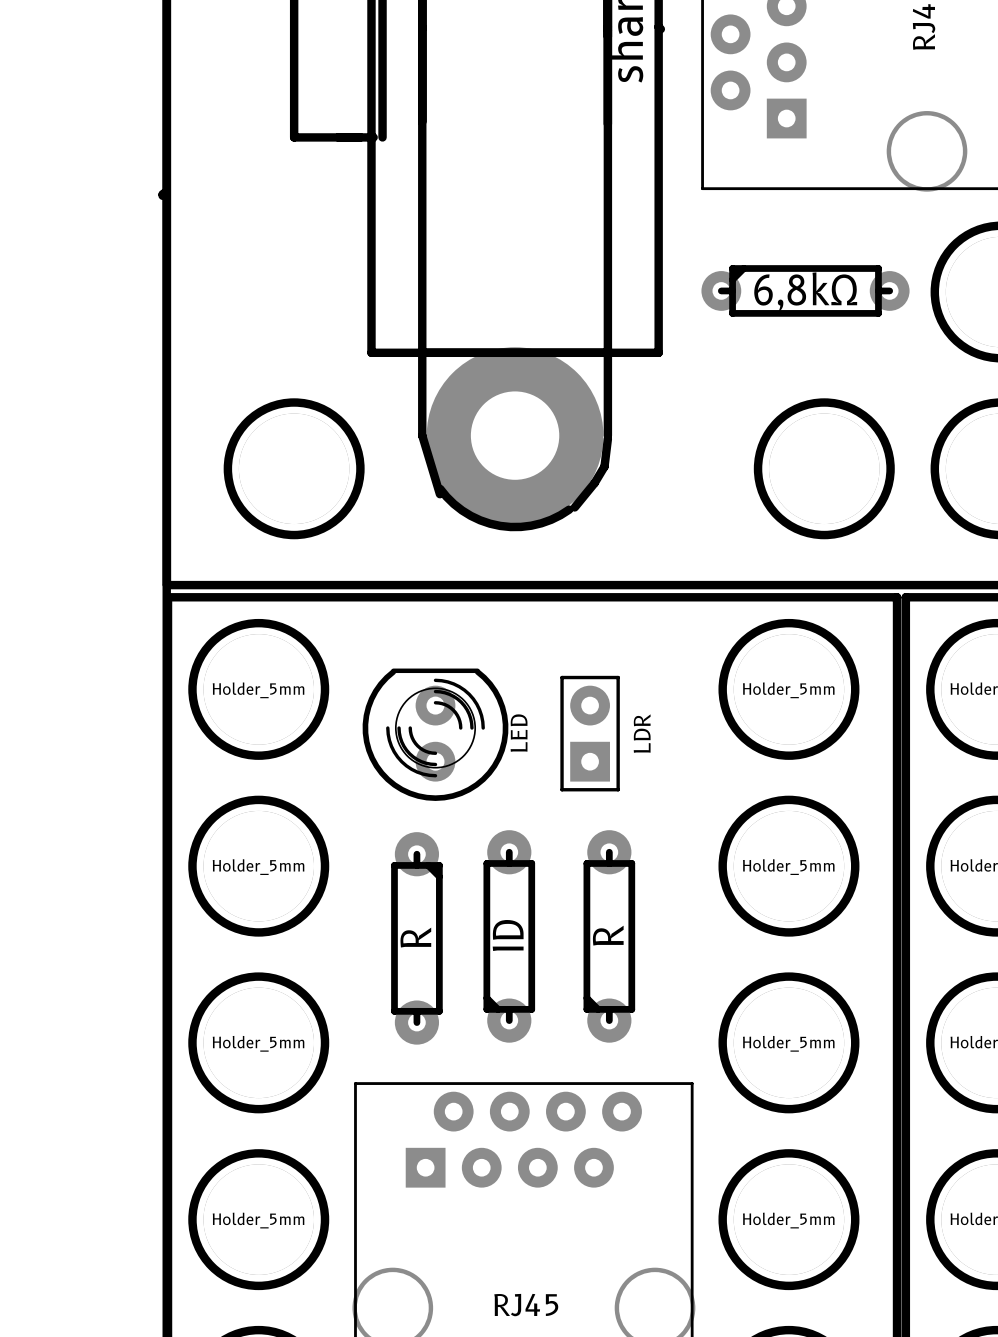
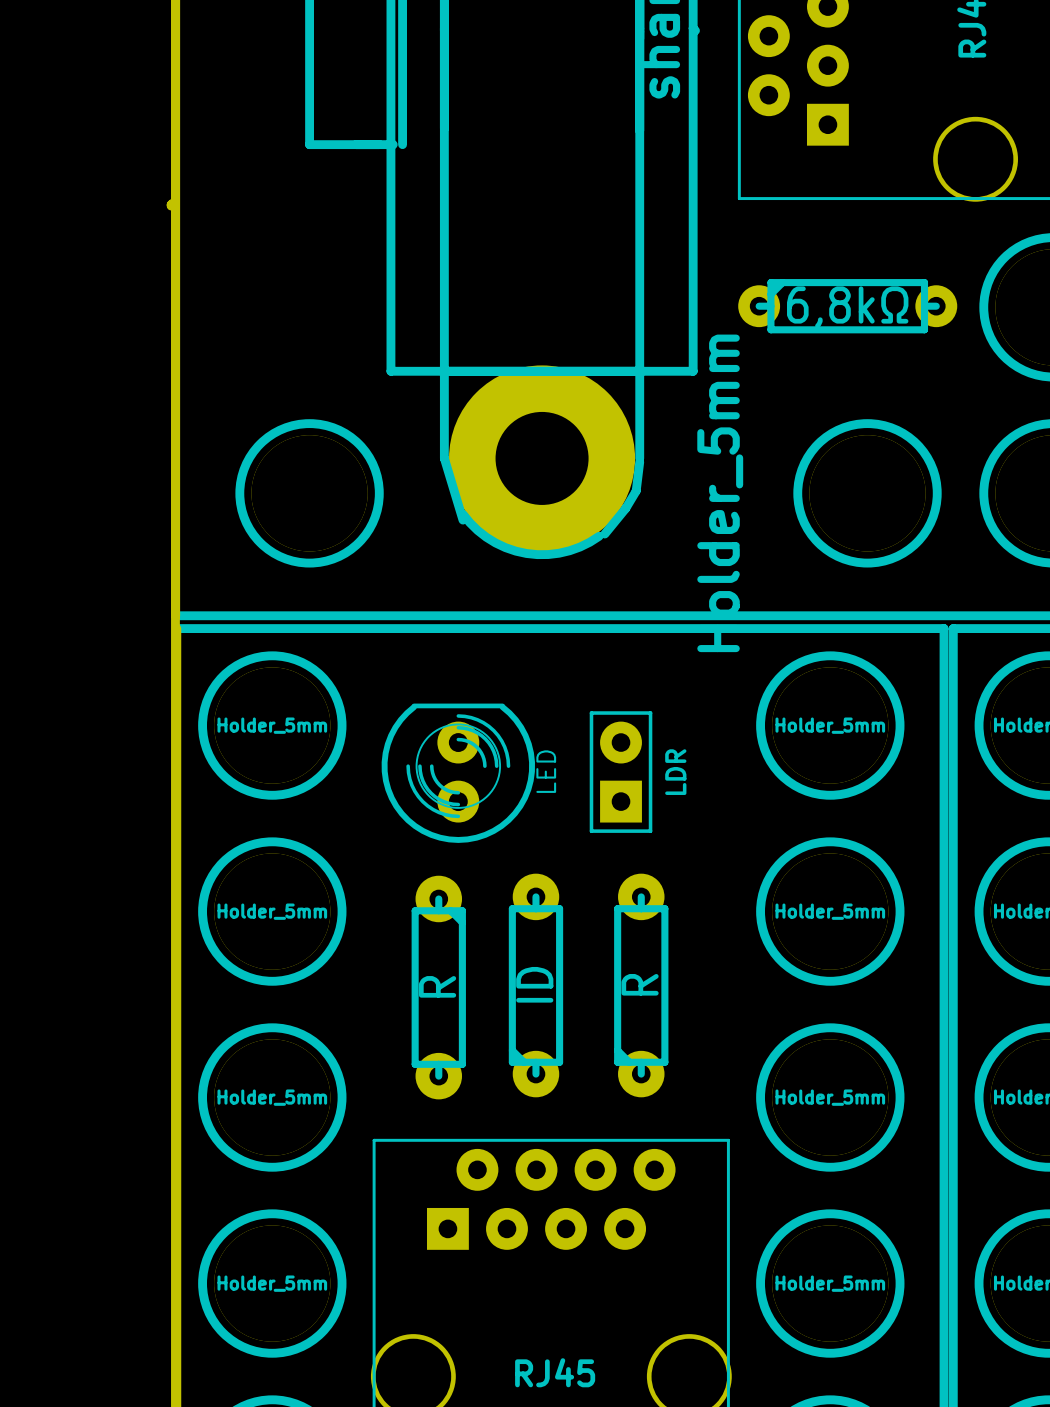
Holder_5mm name: none -> Holder_5mm (720, 493)

